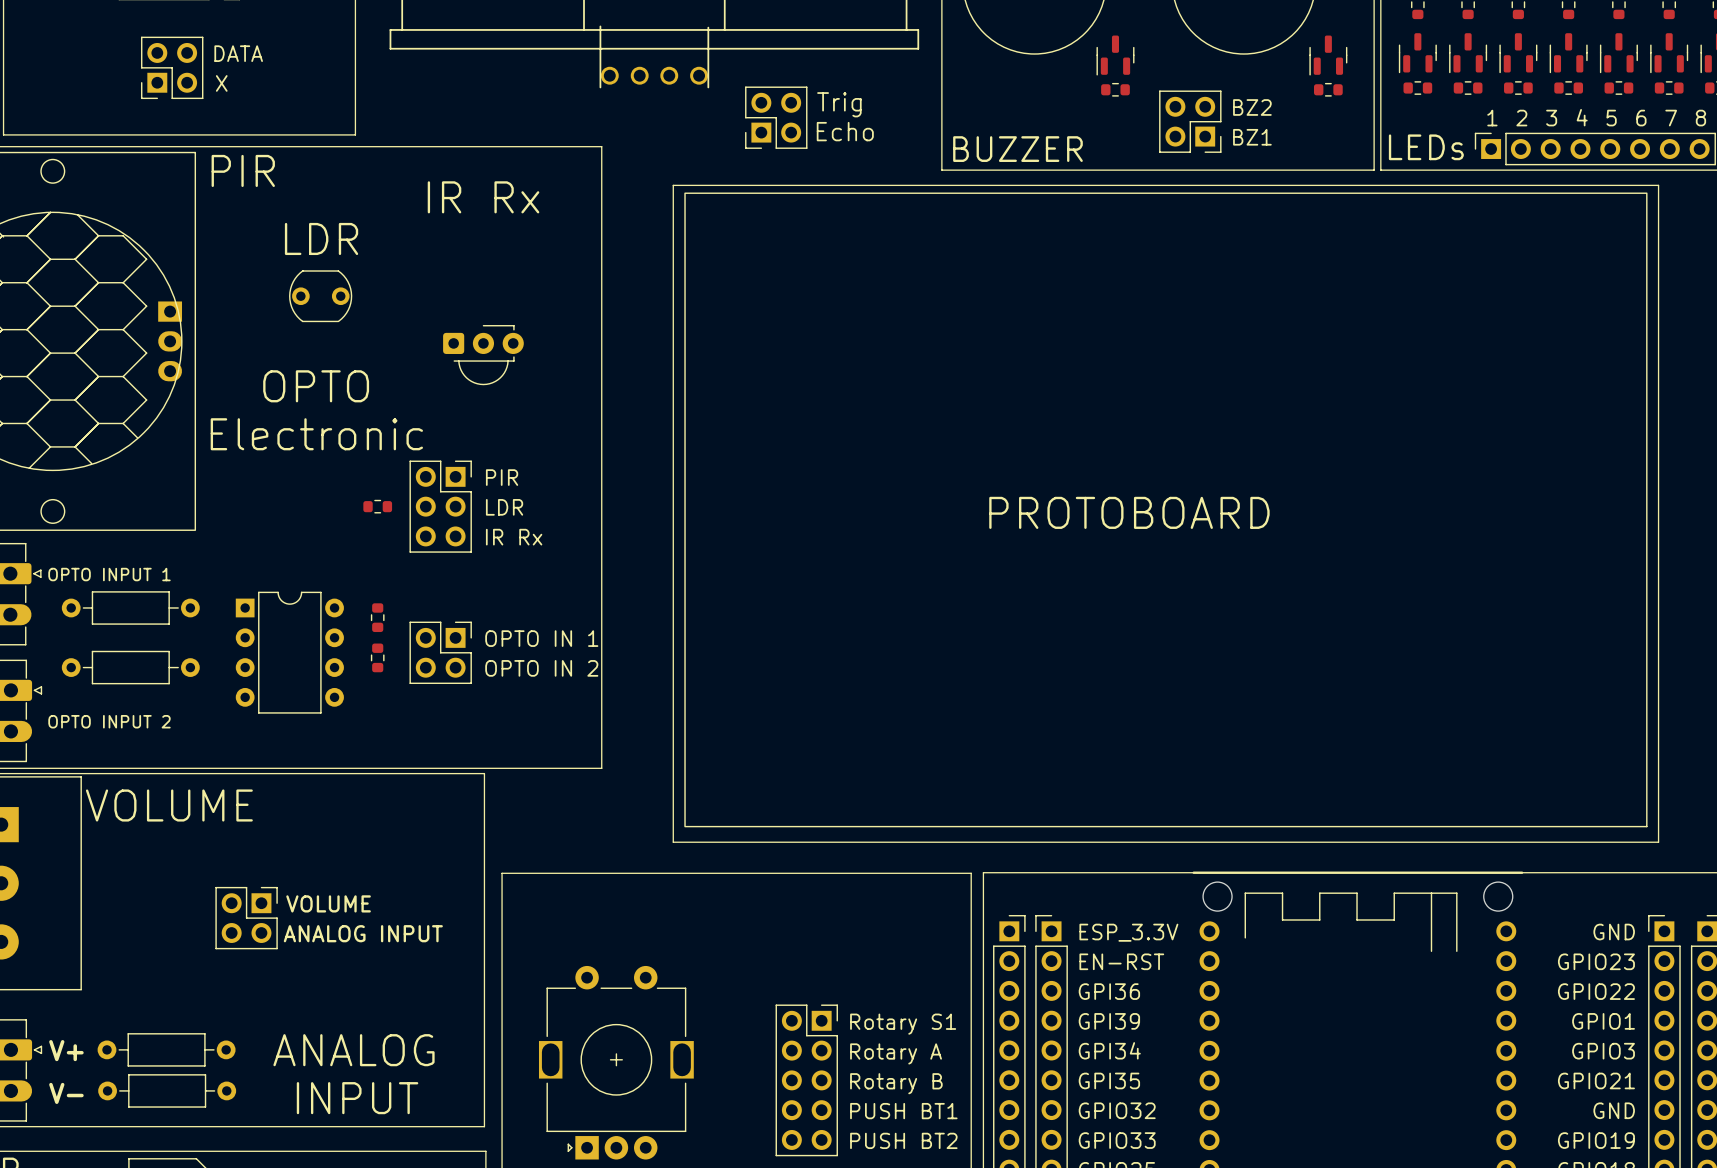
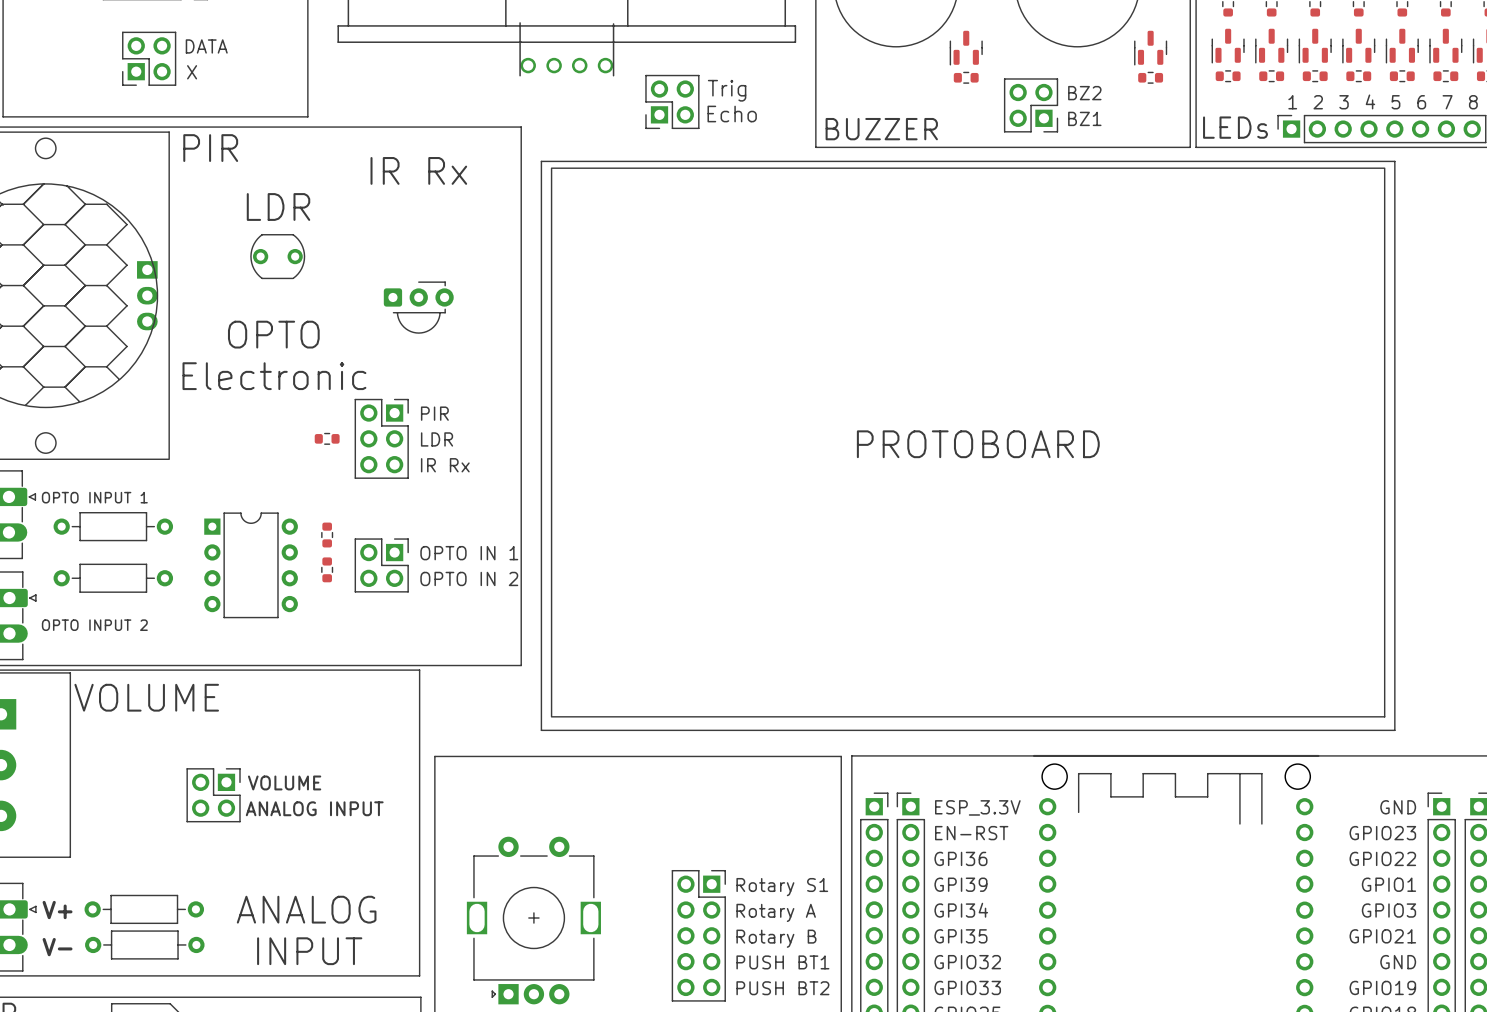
line: (673, 185) (1658, 185) (1658, 842) (673, 842) (673, 185) -> (541, 161) (541, 730) (1394, 730) (1394, 161) (541, 161)
drawing position: (1165, 509) -> (968, 442)

